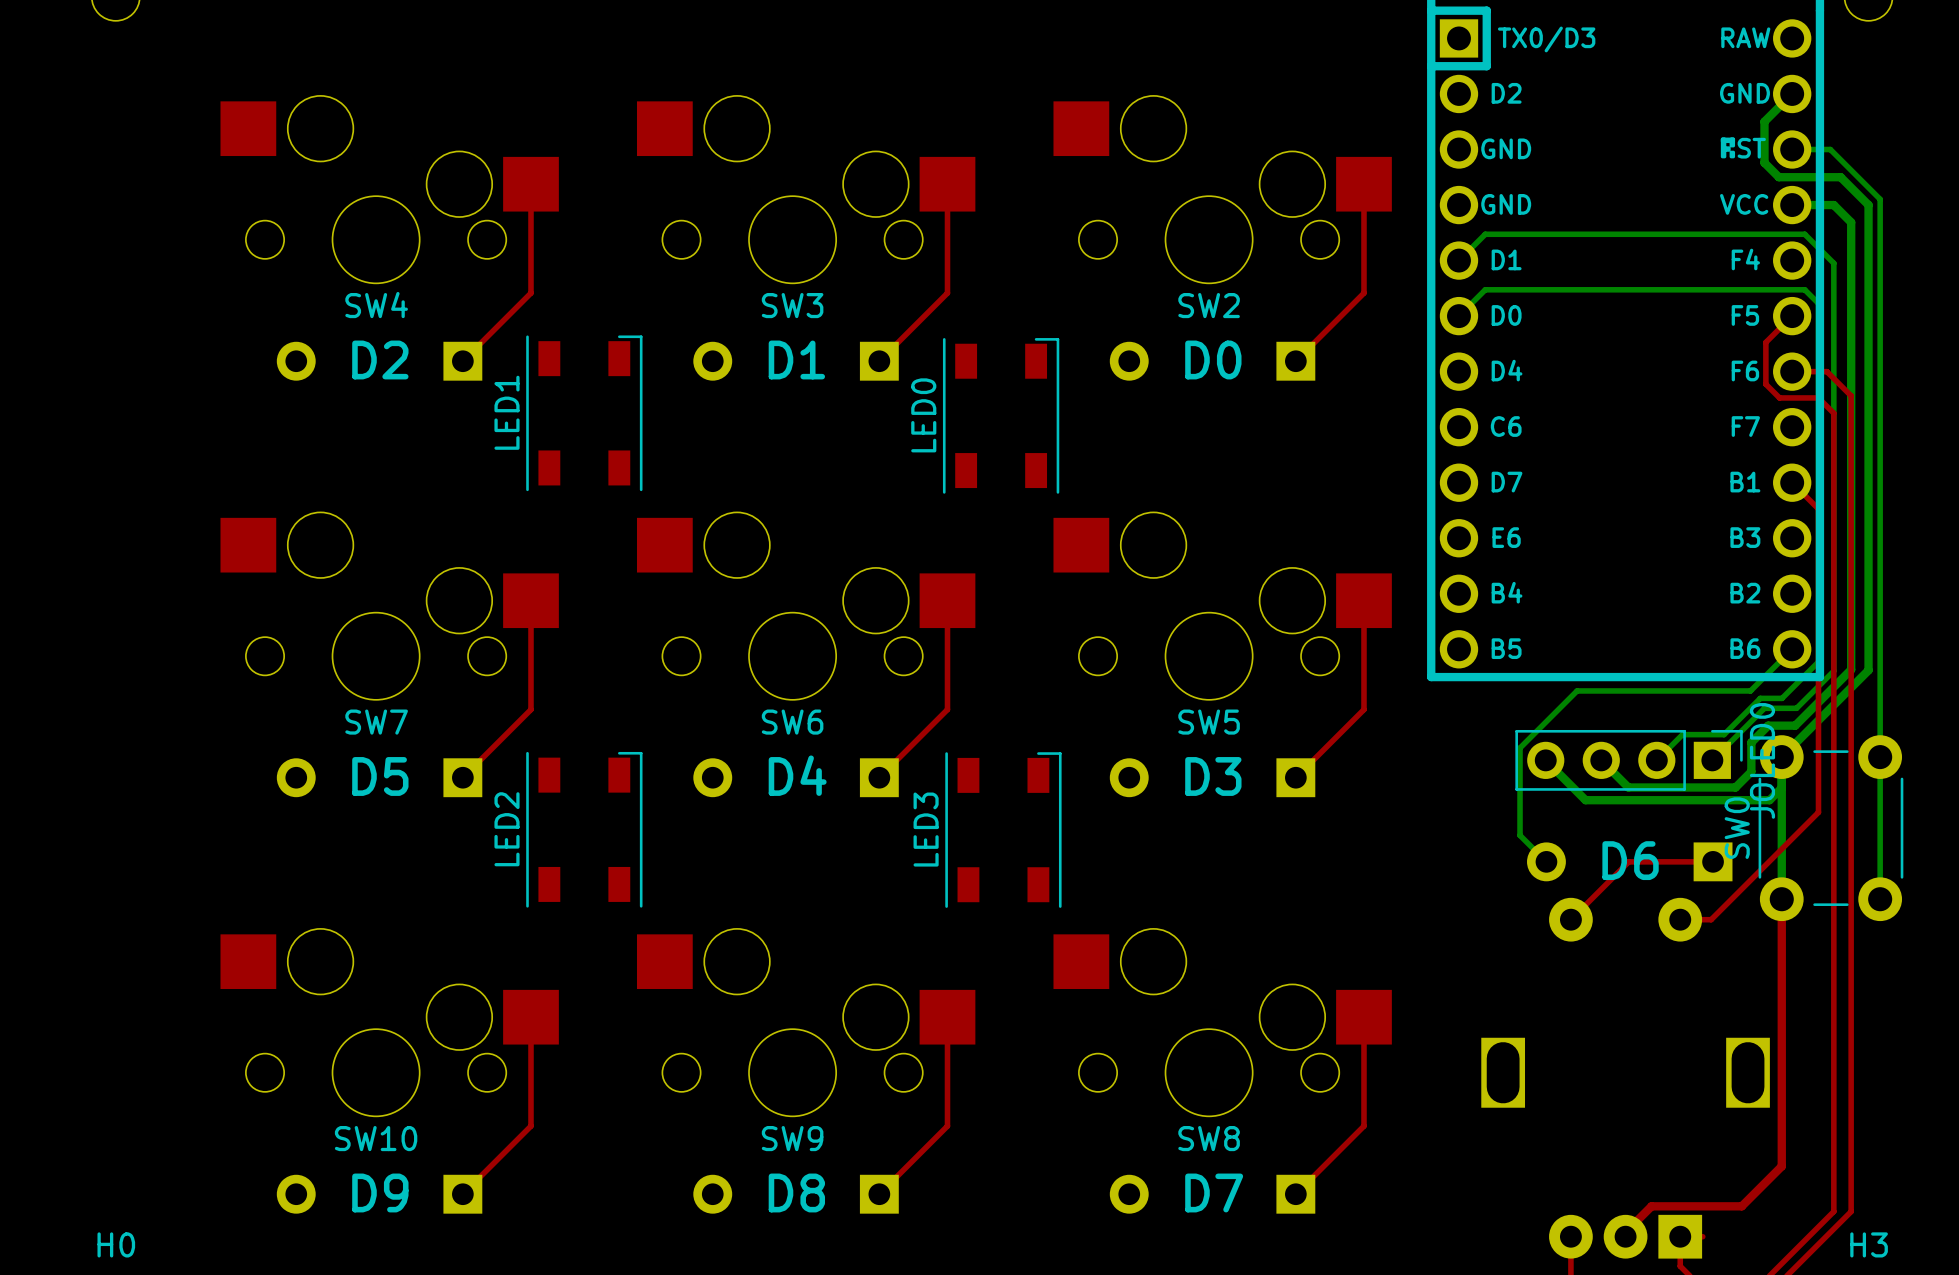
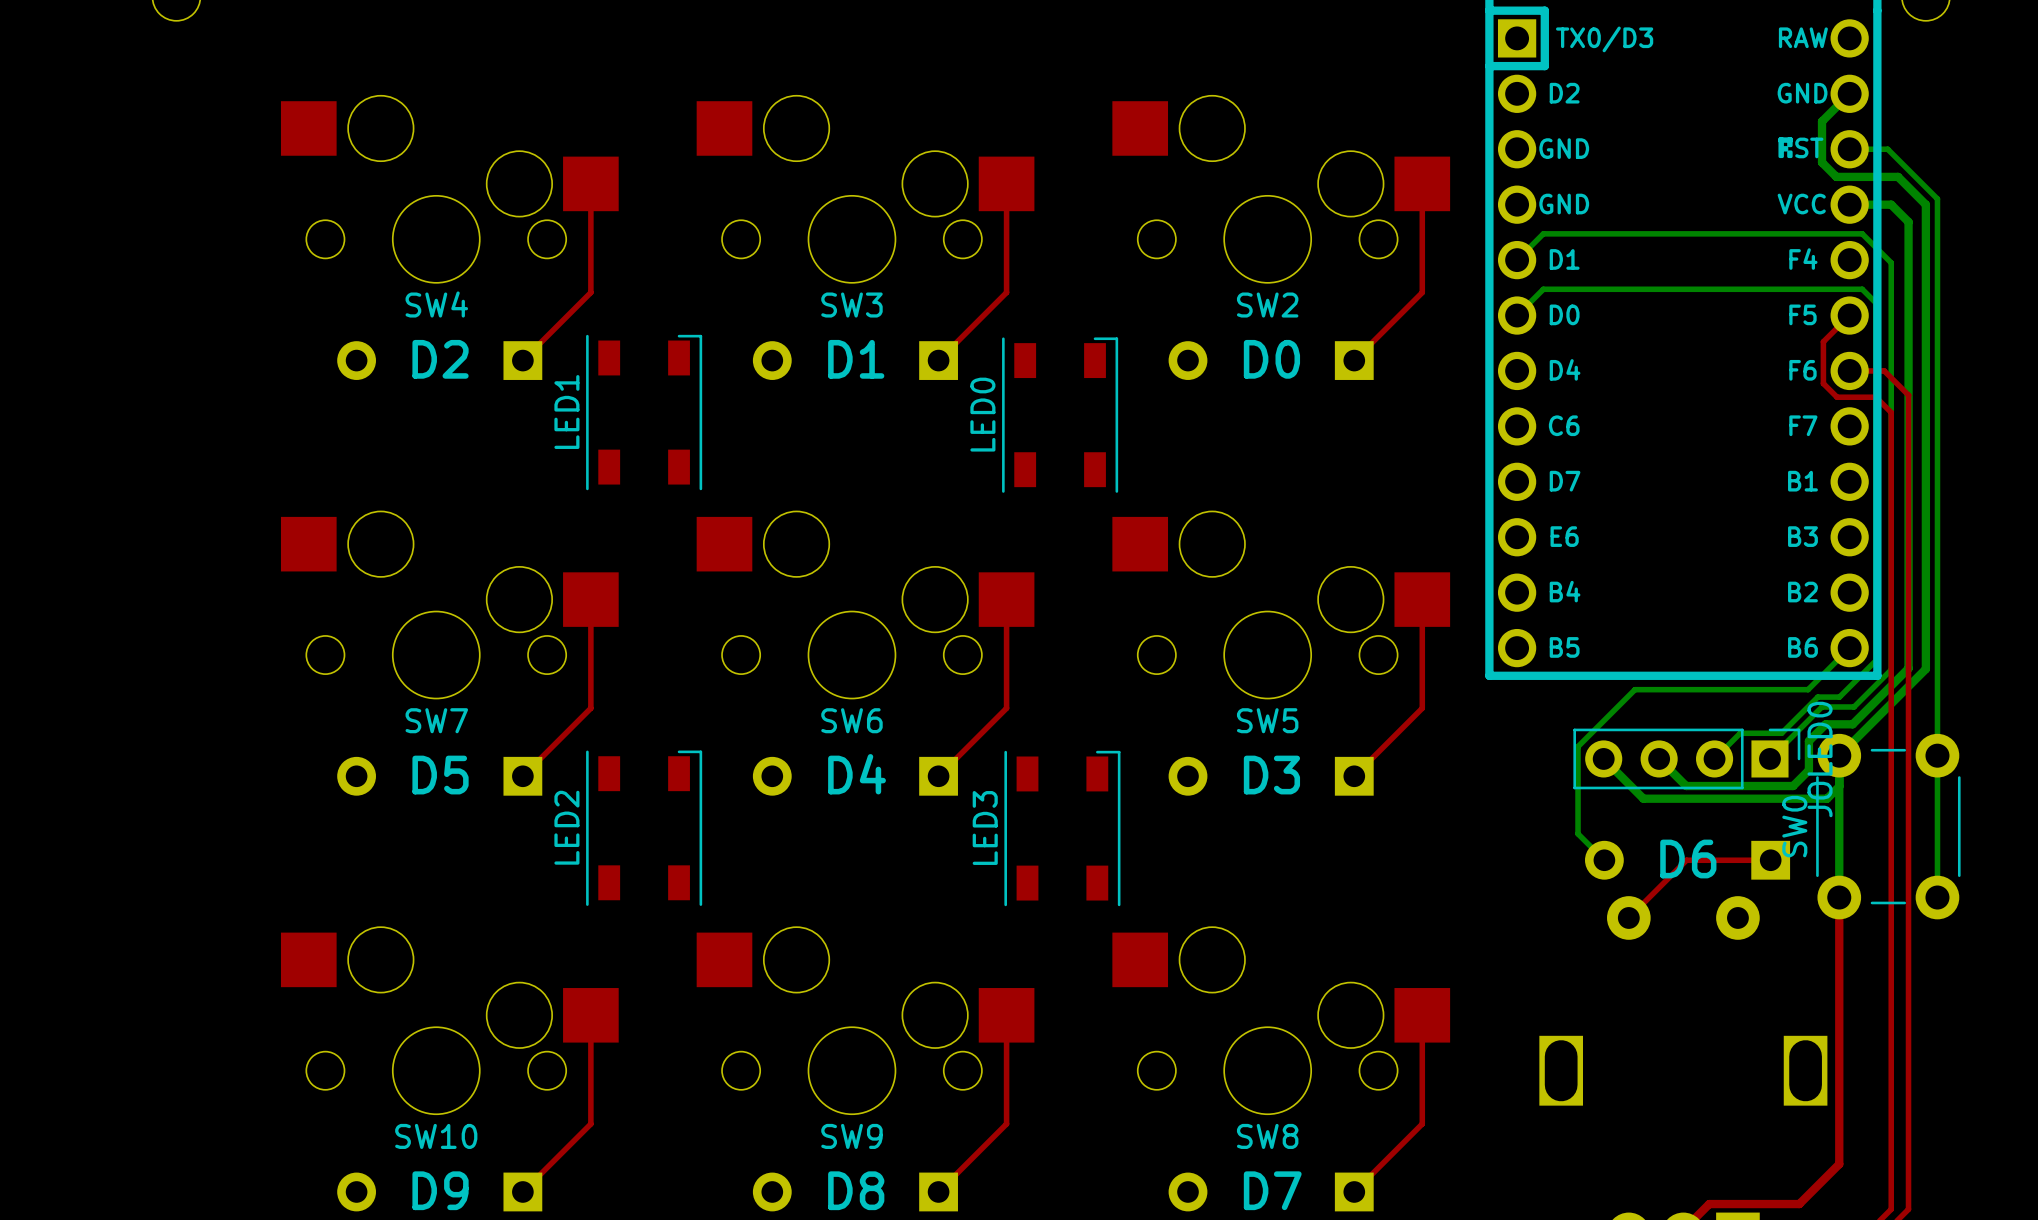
top track: (1792, 482) (1818, 509) (1818, 812) (1711, 919) (1680, 919) -> none

